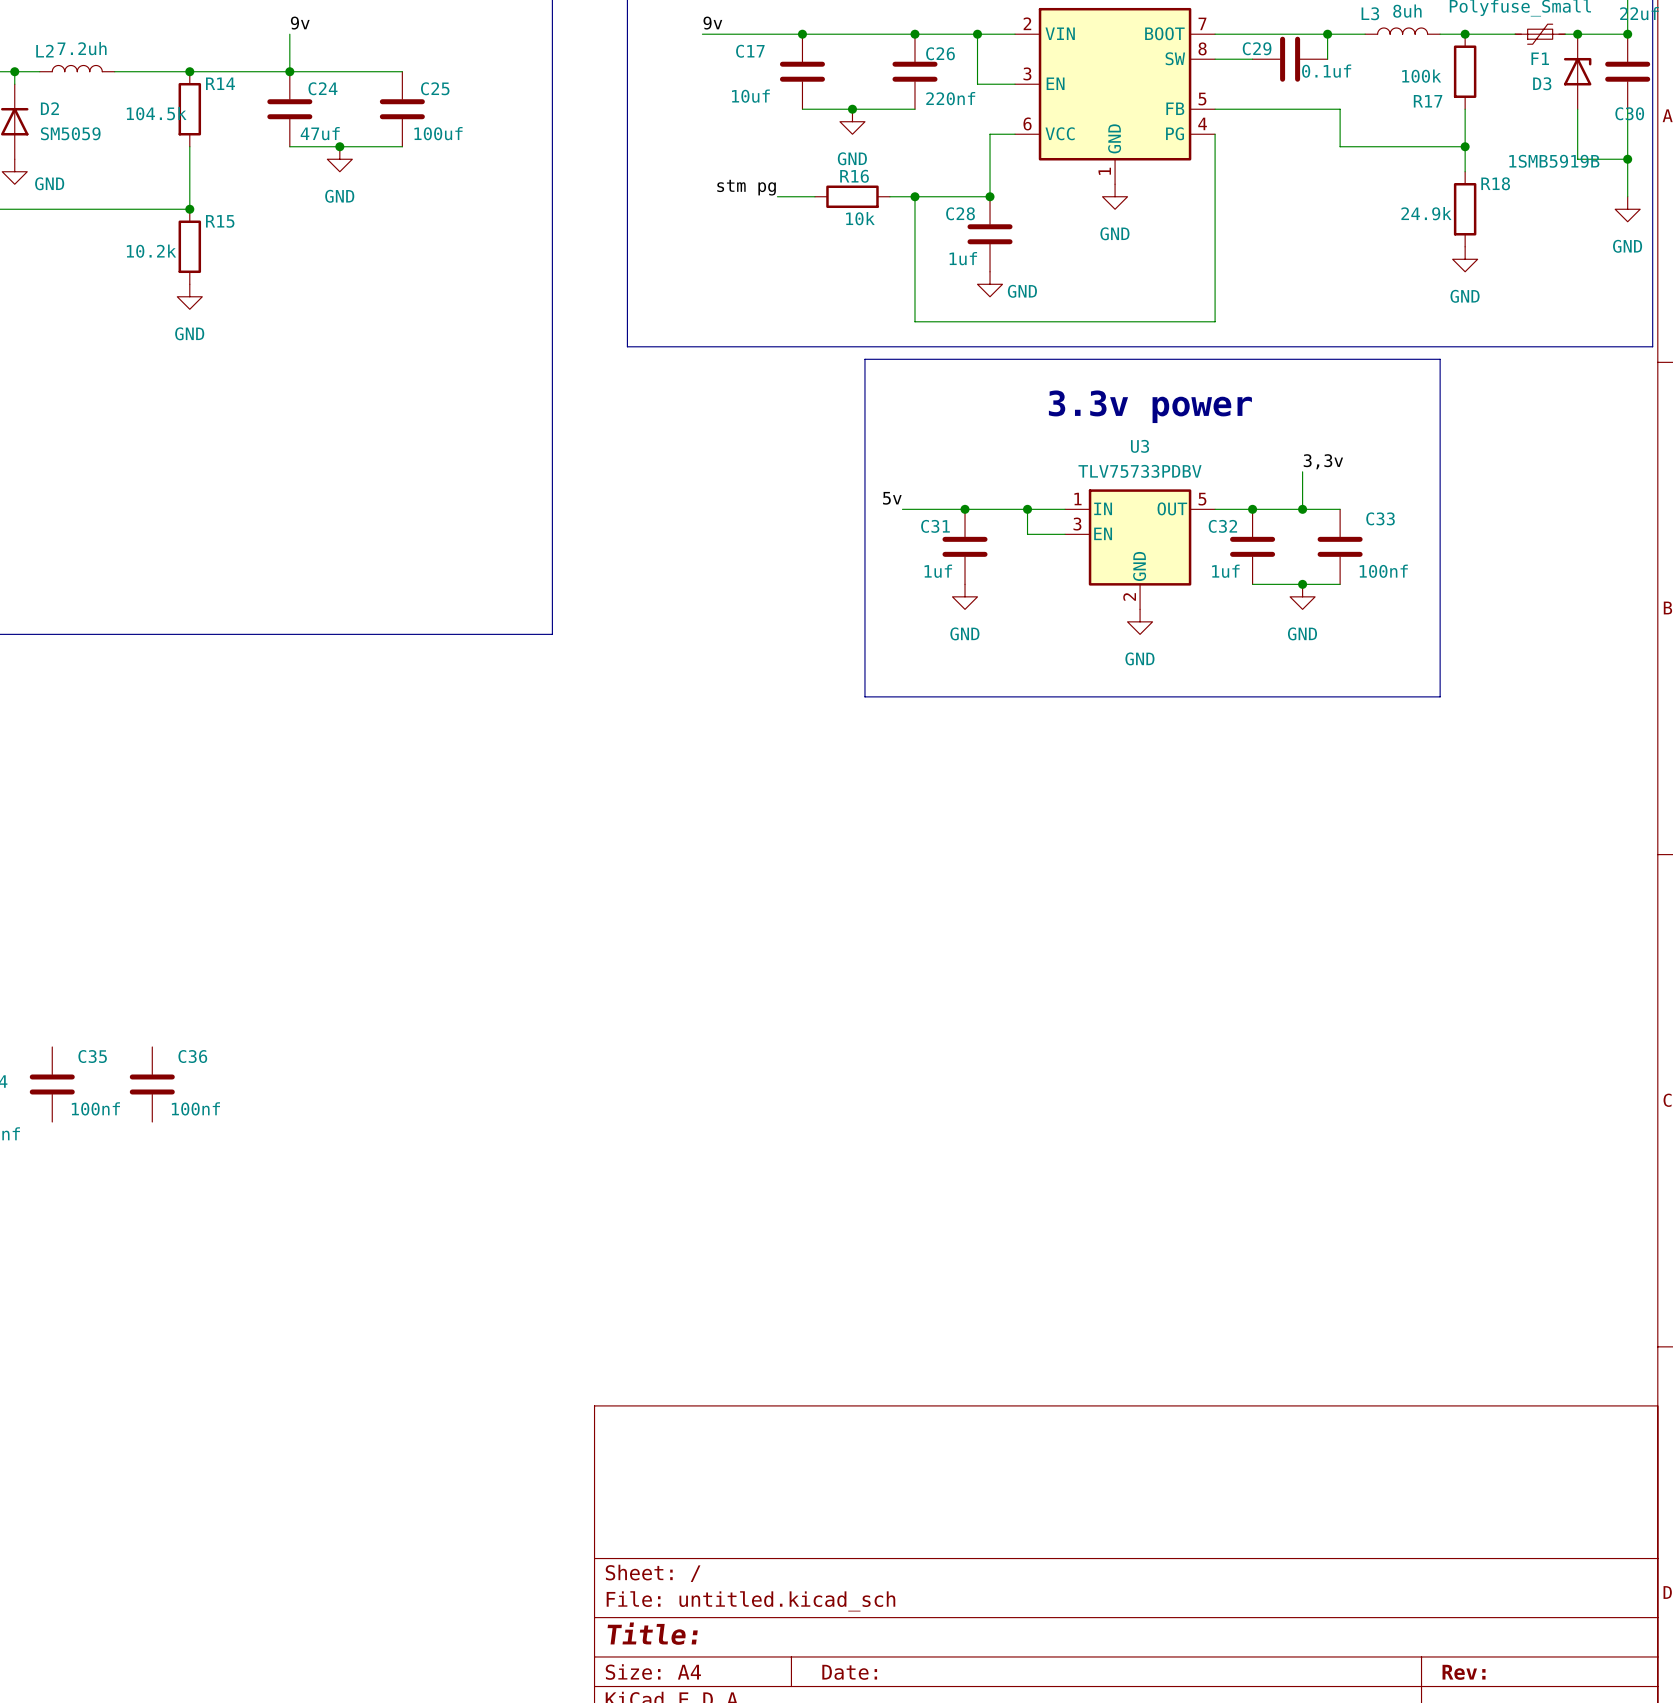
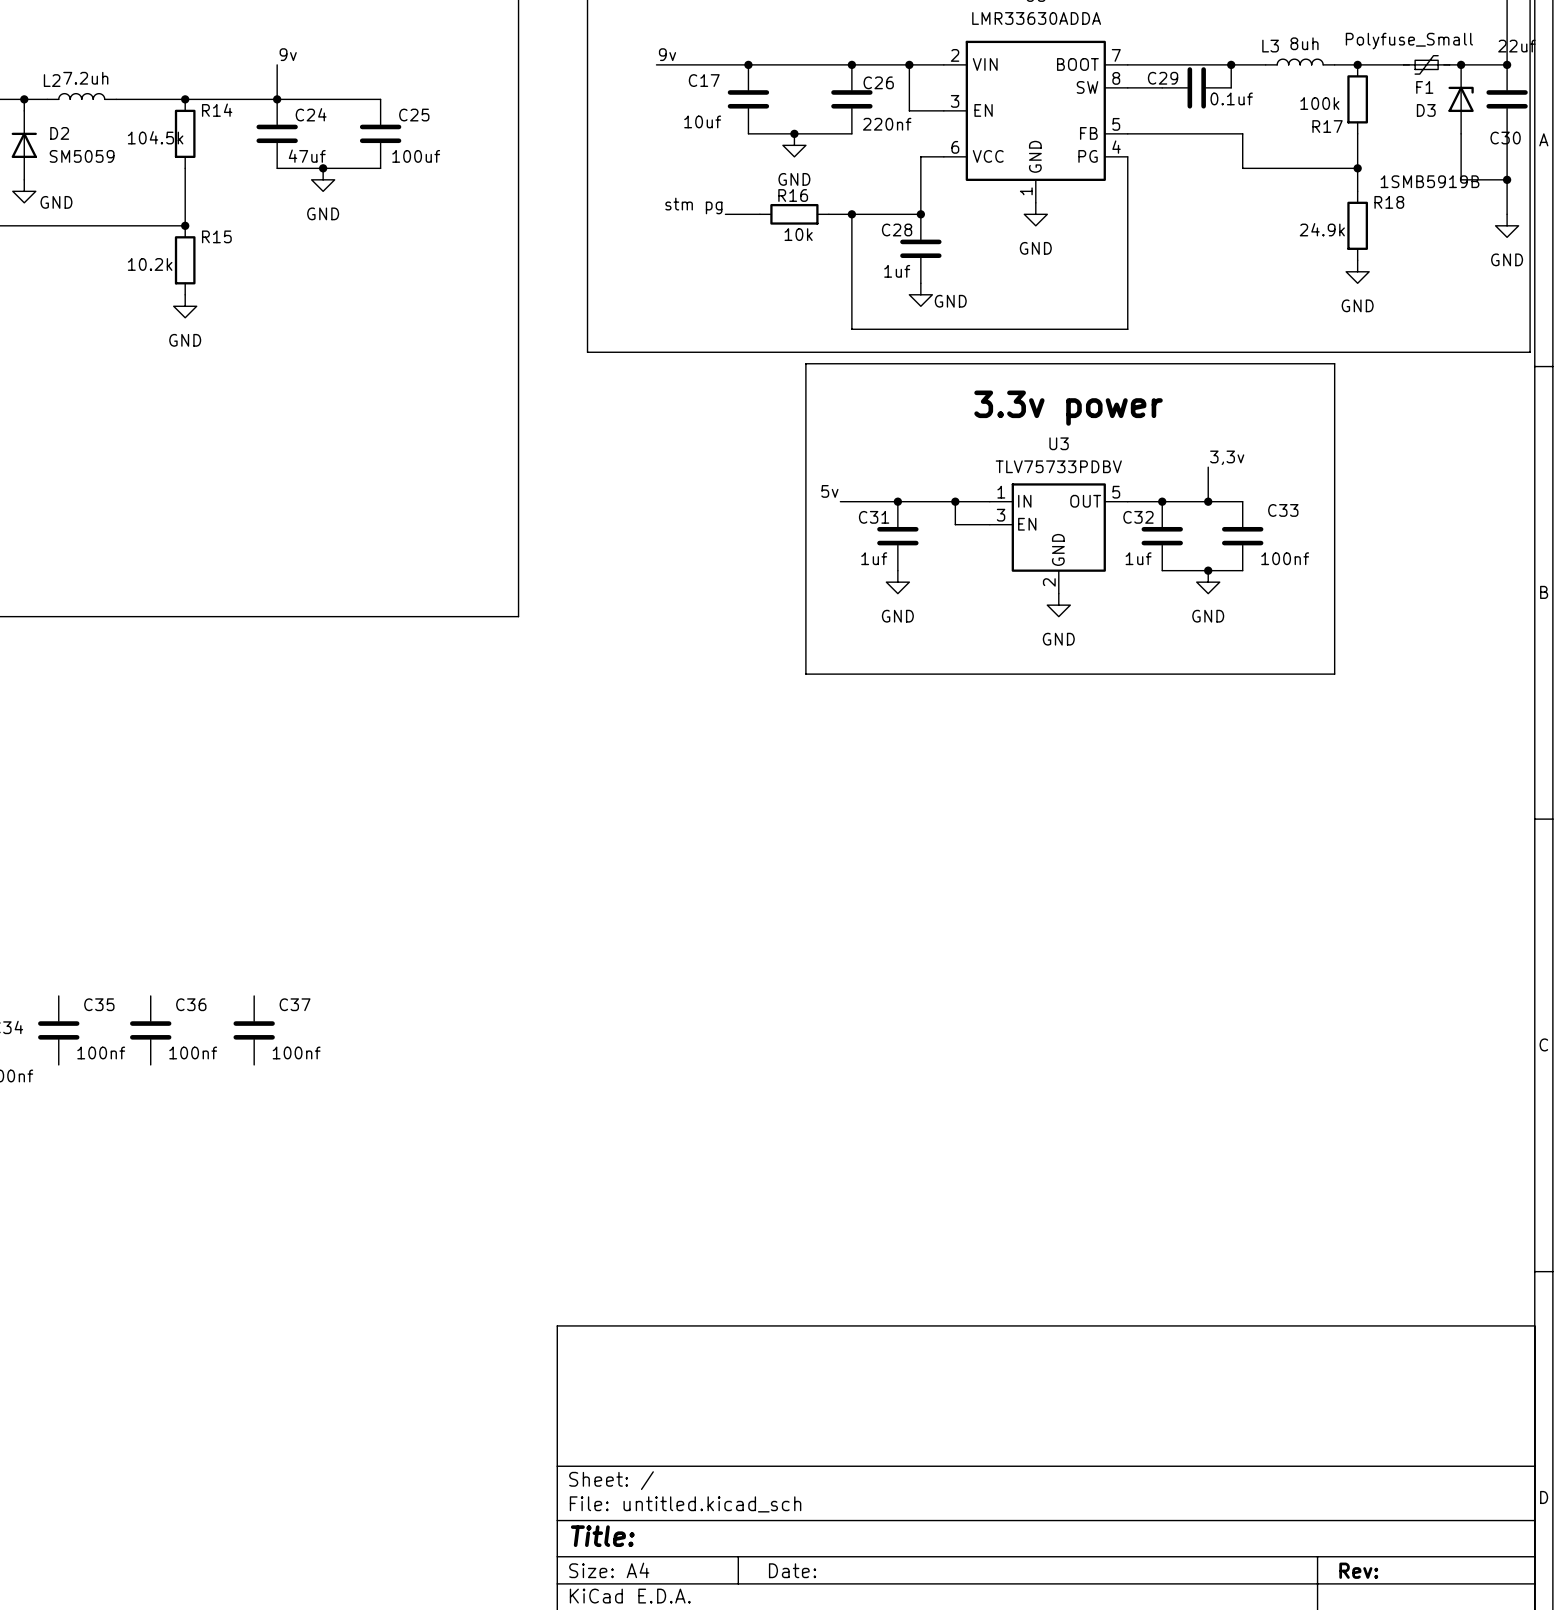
C37: none -> 100nf (254, 1030)

